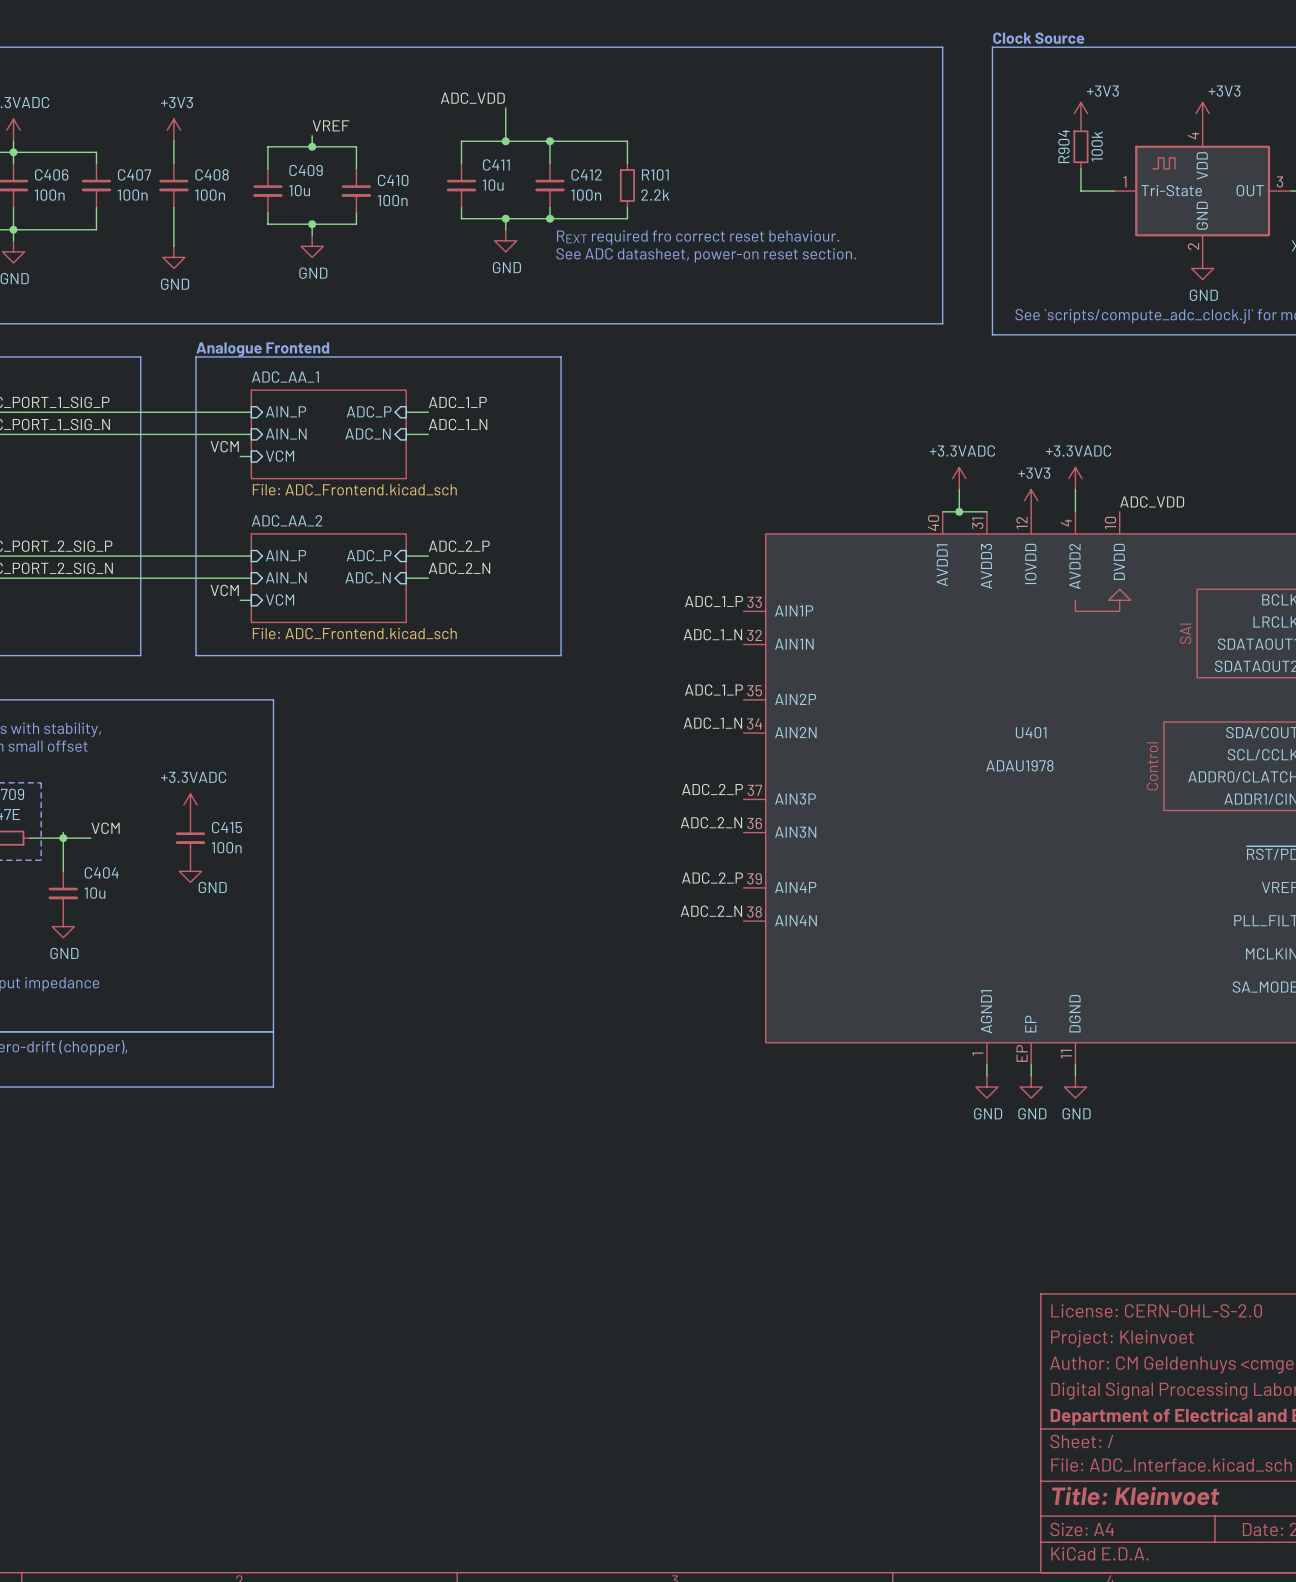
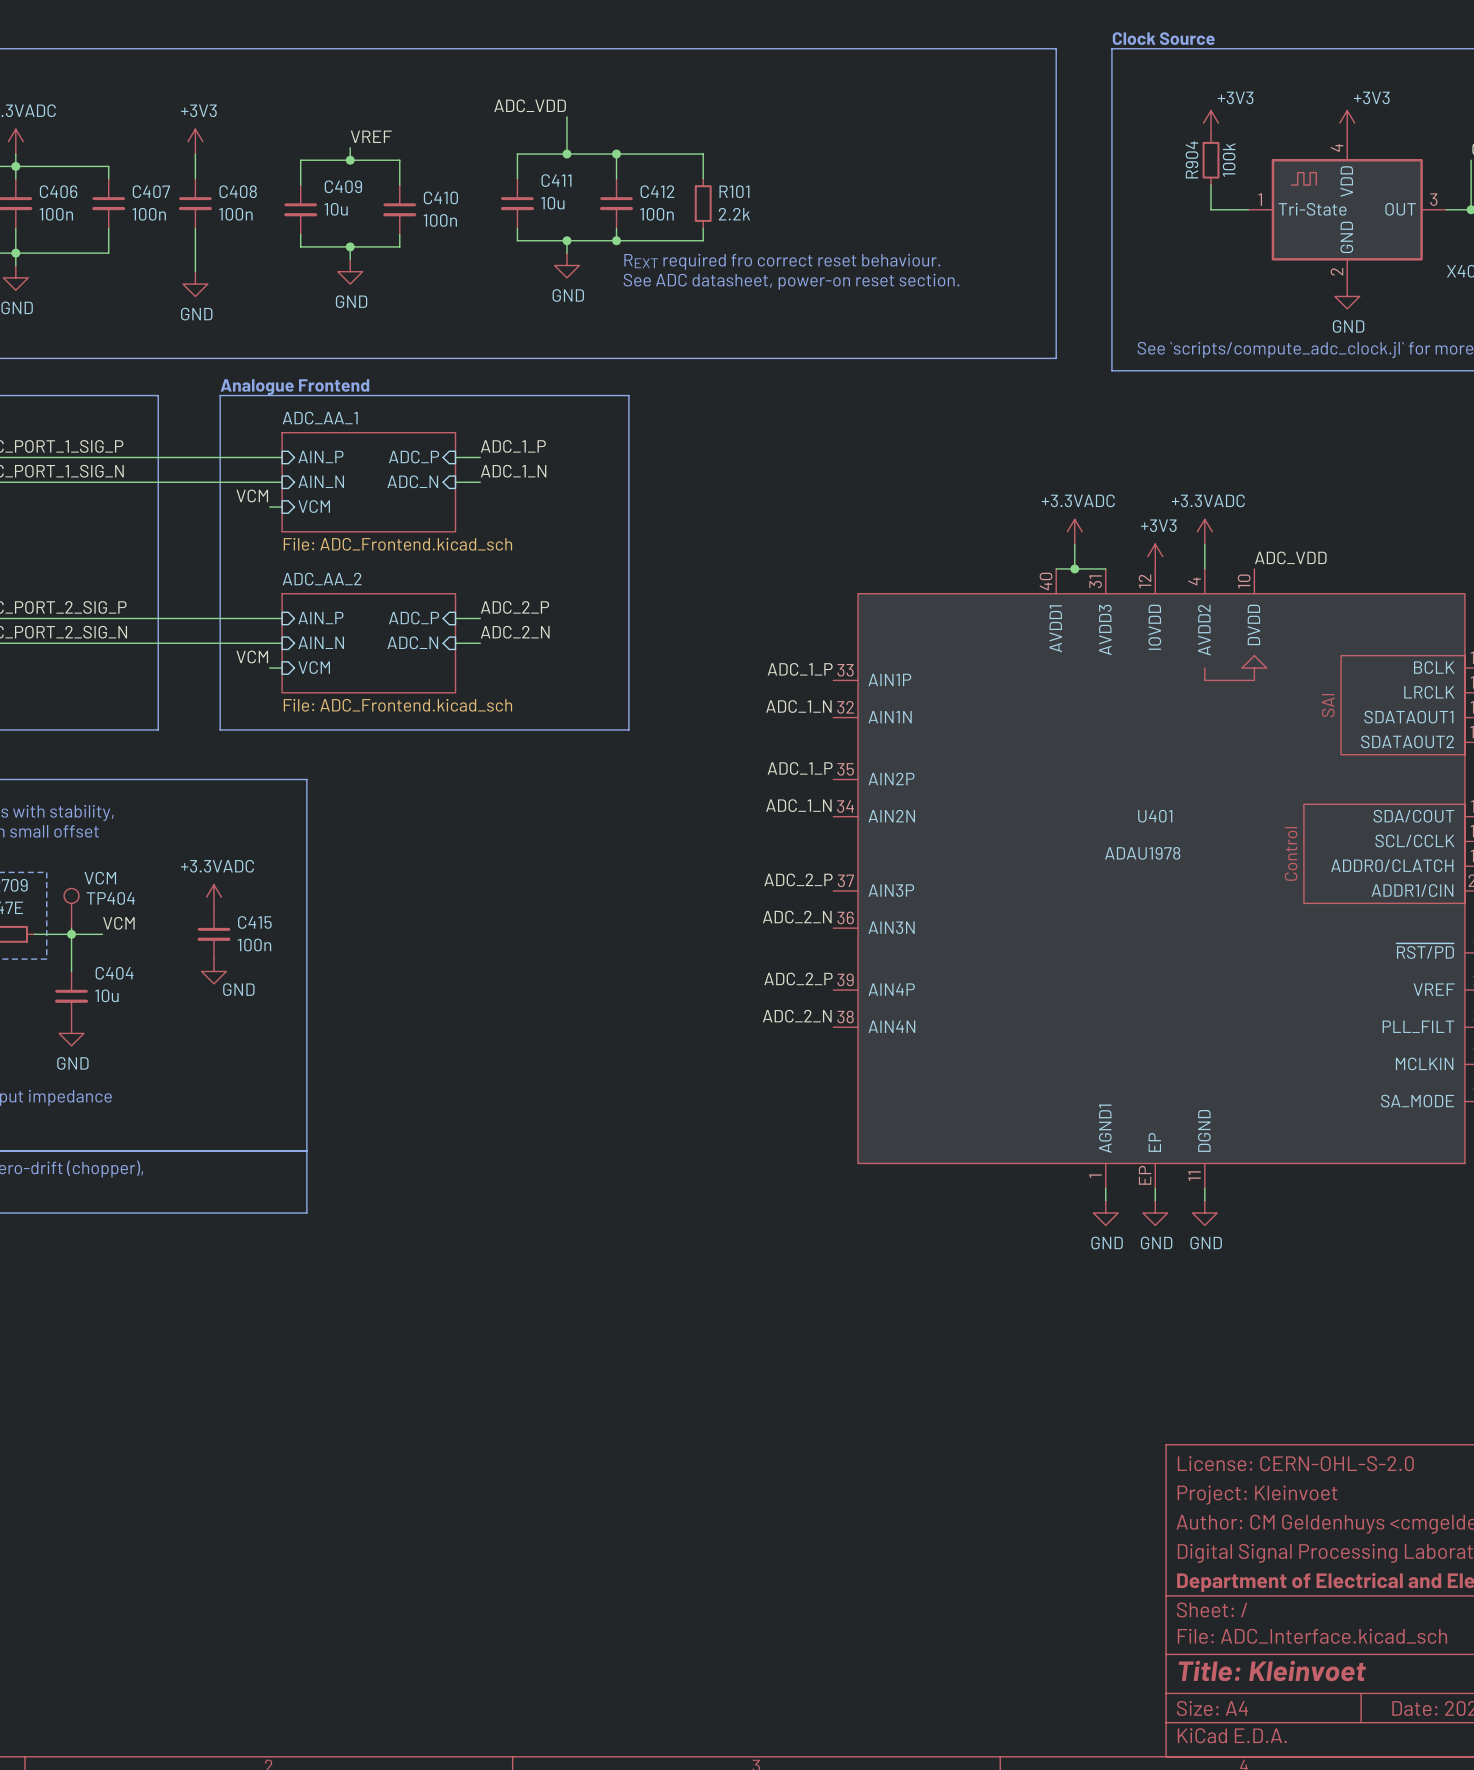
TP404: none -> VCM (71, 908)

